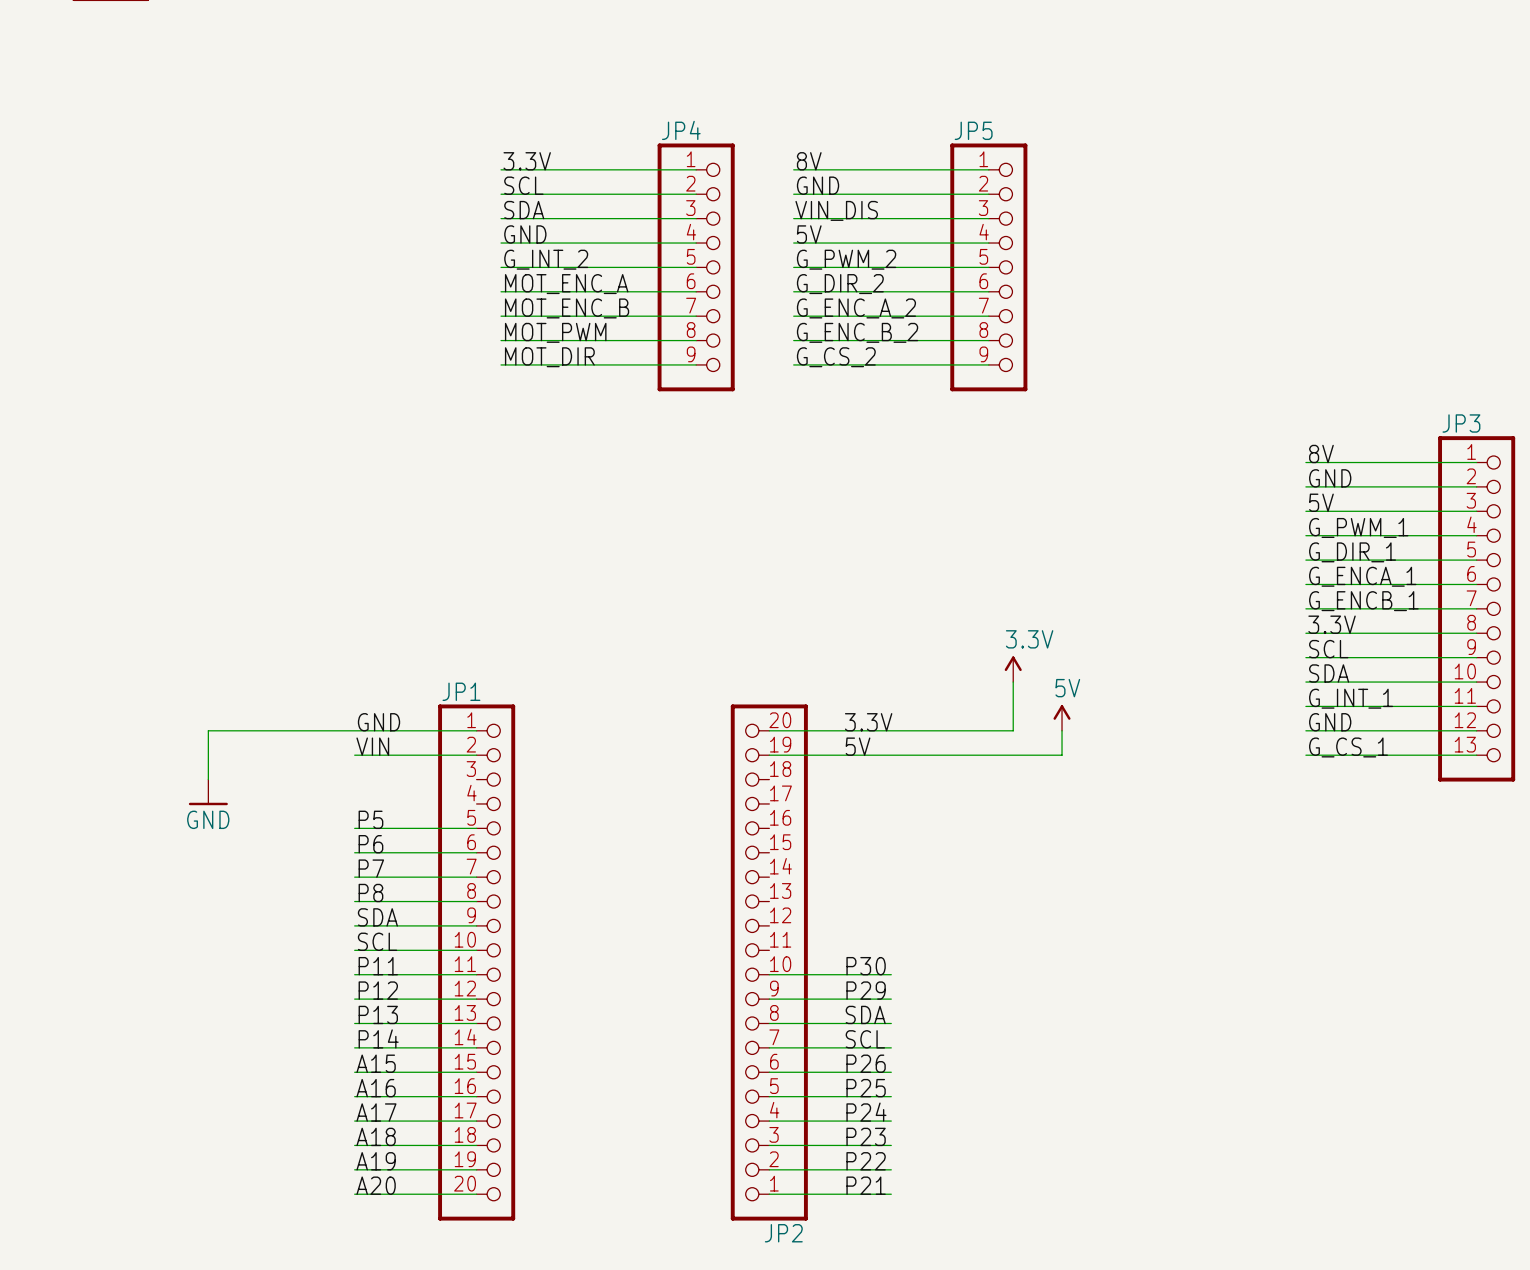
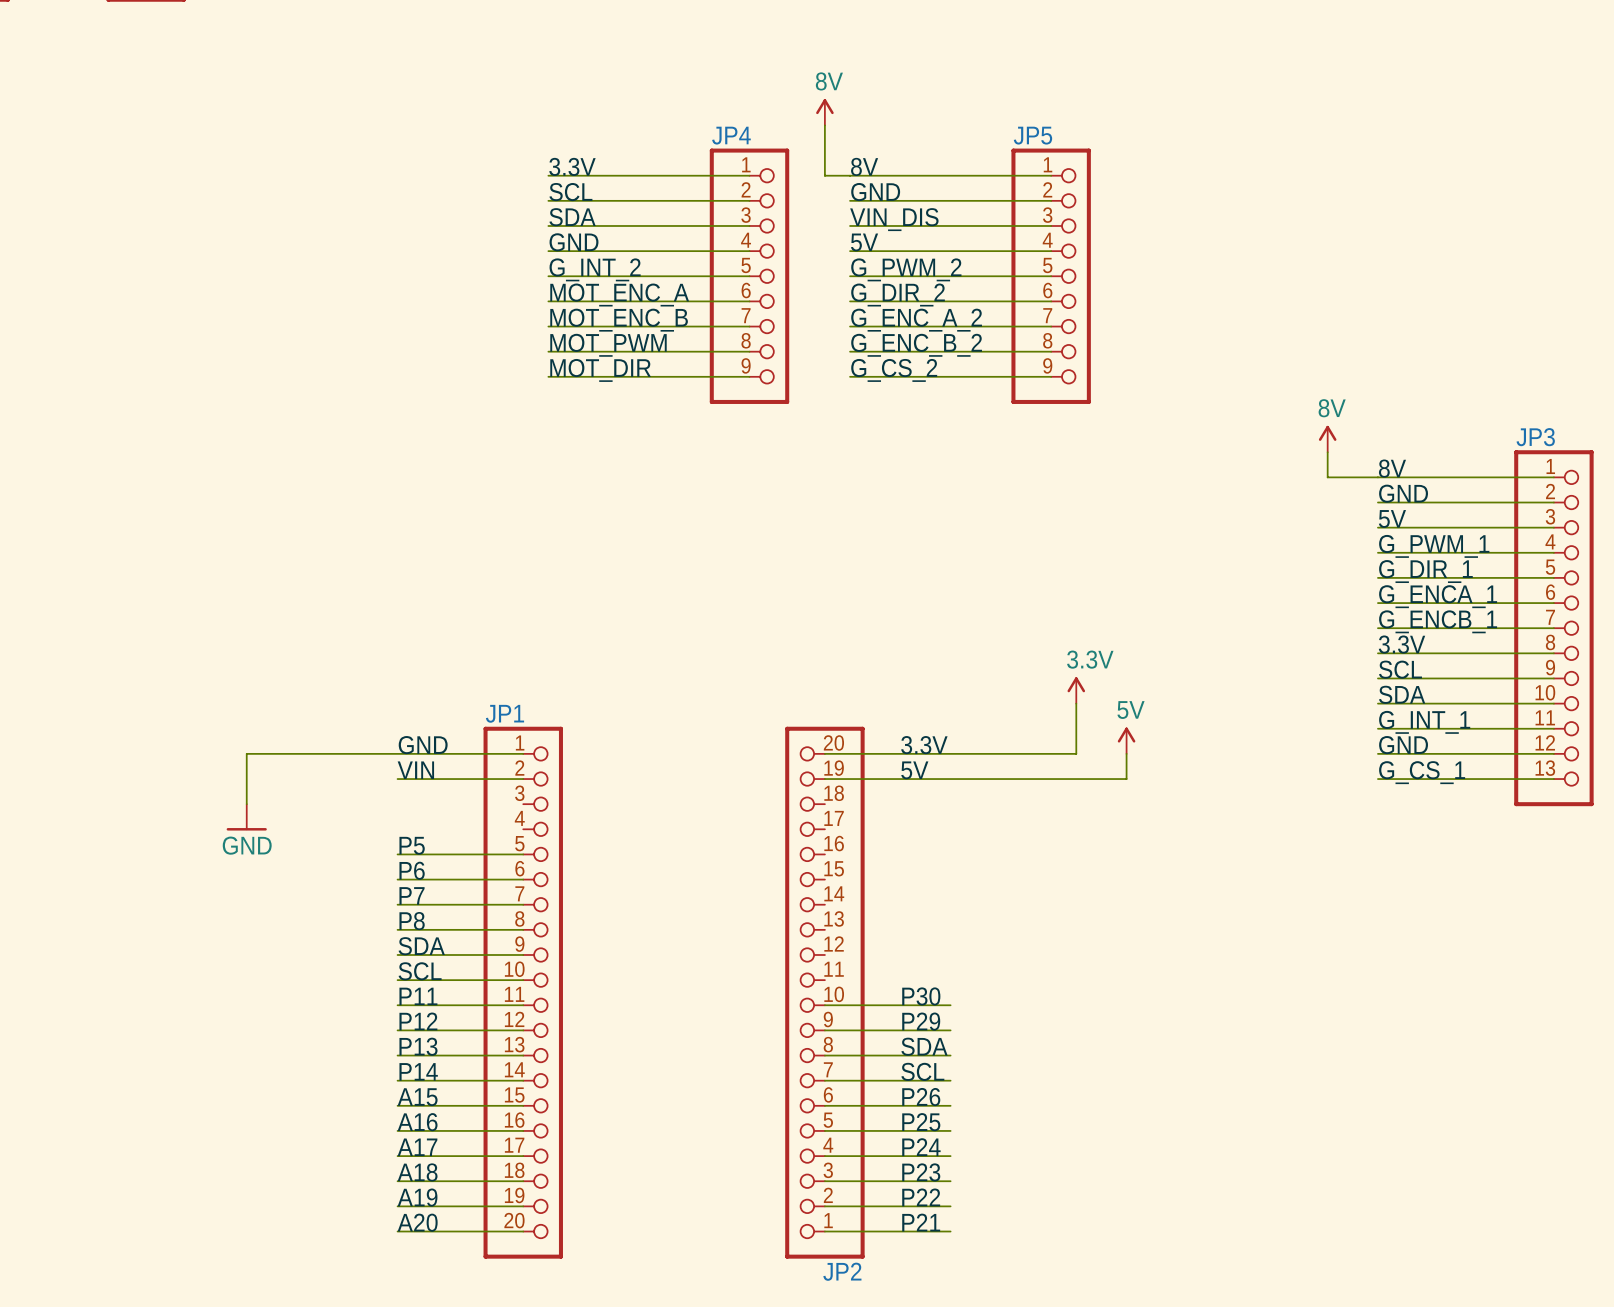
power symbol: none -> 8V (824, 112)
wire: none -> (824, 125) (824, 175) (850, 175)
power symbol: none -> 8V (1327, 439)
wire: none -> (1327, 452) (1327, 477) (1377, 477)

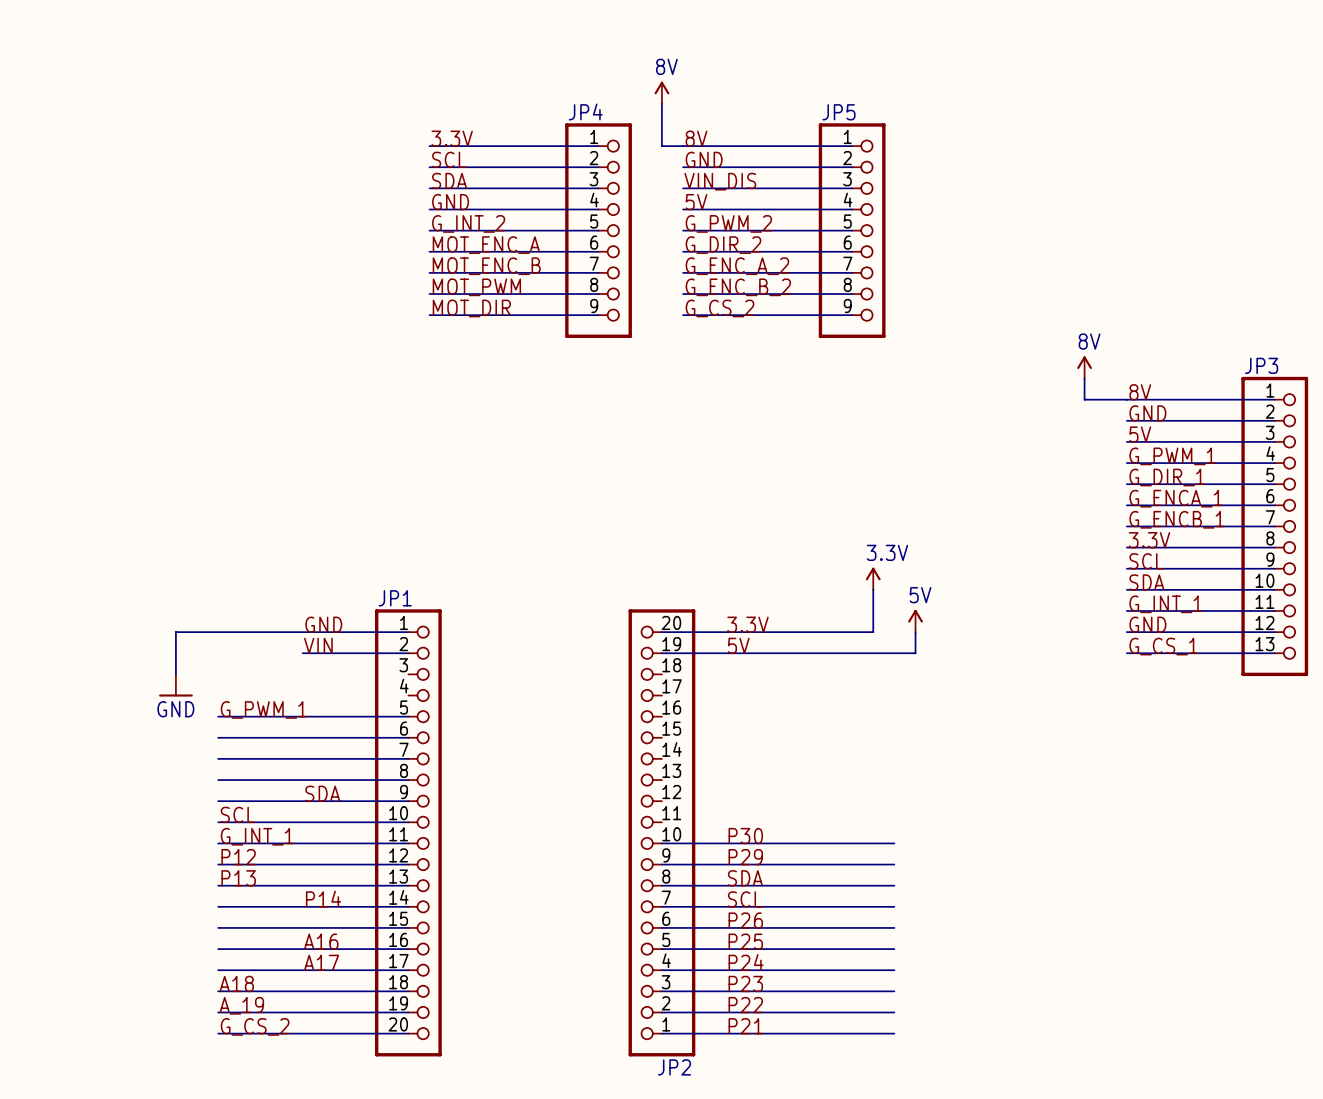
label: P5 (412, 845) -> none
label: none -> G_PWM_1 (263, 709)
wire: none -> (218, 716) (302, 716)
label: P6 (412, 870) -> none
wire: none -> (218, 737) (302, 737)
label: P7 (412, 895) -> none
wire: none -> (218, 758) (302, 758)
label: P8 (412, 921) -> none
wire: none -> (218, 780) (302, 780)
wire: none -> (218, 801) (302, 801)
label position: SCL (420, 971) -> SCL (237, 814)
wire: none -> (218, 822) (302, 822)
label: P11 (418, 996) -> none
label: none -> G_INT_1 (257, 836)
wire: none -> (218, 843) (302, 843)
wire: none -> (767, 843) (894, 843)
label position: P12 (418, 1021) -> P12 (238, 857)
wire: none -> (218, 864) (302, 864)
wire: none -> (767, 864) (894, 864)
label position: P13 (418, 1046) -> P13 (238, 878)
wire: none -> (218, 885) (302, 885)
wire: none -> (767, 885) (894, 885)
wire: none -> (218, 906) (302, 906)
wire: none -> (767, 906) (894, 906)
label: A15 (417, 1097) -> none
wire: none -> (218, 927) (302, 927)
wire: none -> (767, 927) (894, 927)
wire: none -> (218, 949) (302, 949)
wire: none -> (767, 949) (894, 949)
wire: none -> (218, 970) (302, 970)
wire: none -> (767, 970) (894, 970)
label position: A18 (417, 1172) -> A18 (236, 983)
wire: none -> (218, 991) (302, 991)
wire: none -> (767, 991) (894, 991)
label: A19 (417, 1197) -> none
label: none -> A_19 (241, 1005)
wire: none -> (218, 1012) (302, 1012)
wire: none -> (767, 1012) (894, 1012)
label: A20 (417, 1222) -> none
label: none -> G_CS_2 (255, 1026)
wire: none -> (218, 1033) (302, 1033)
wire: none -> (767, 1033) (894, 1033)

